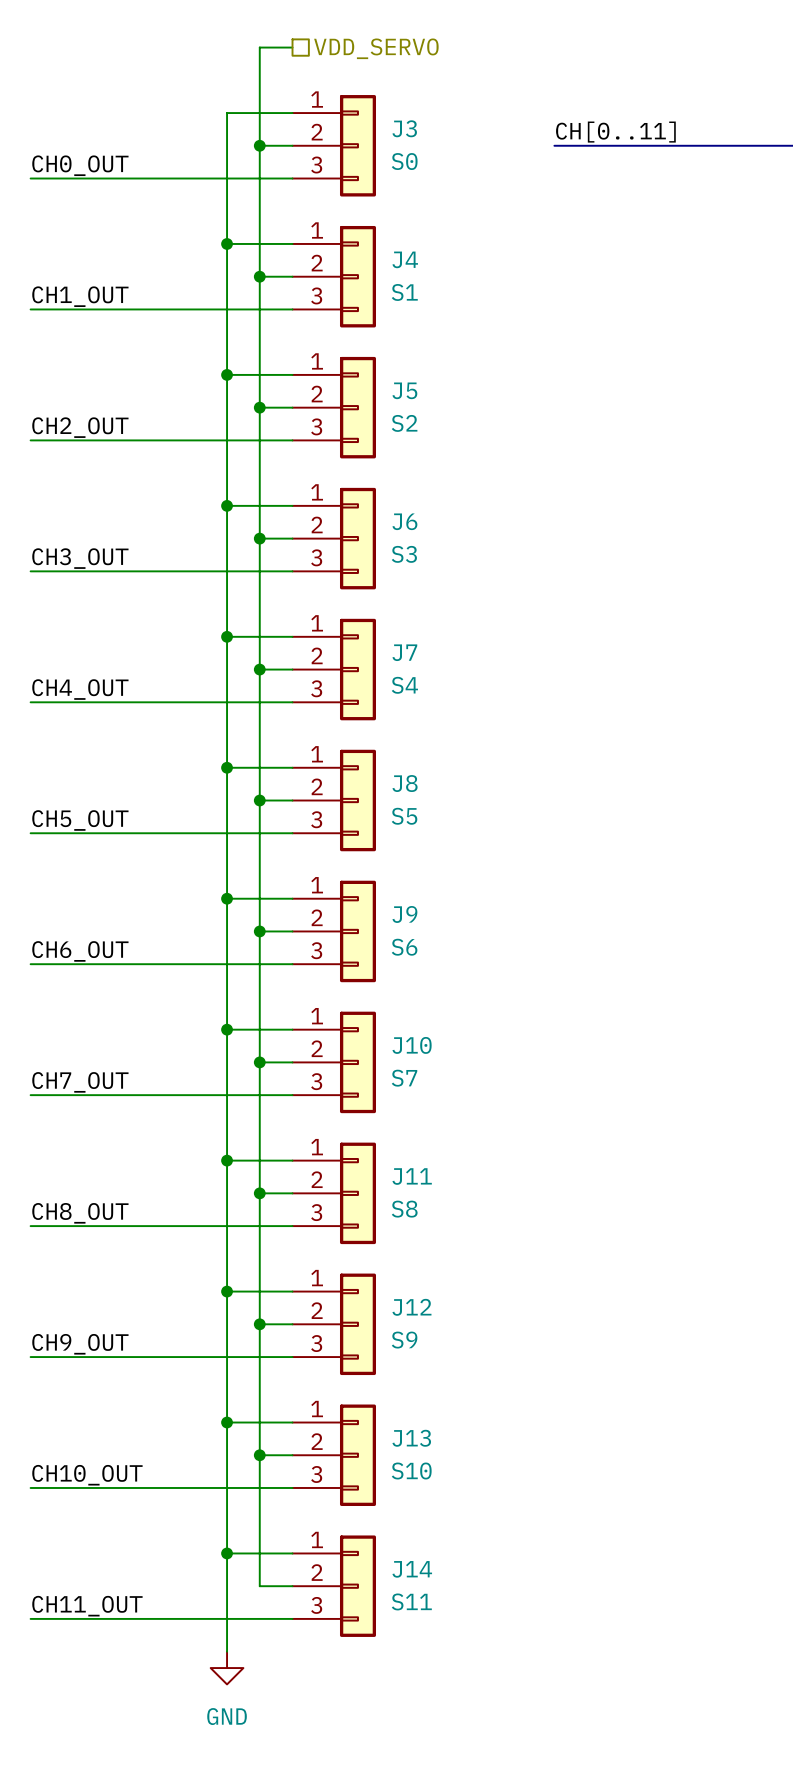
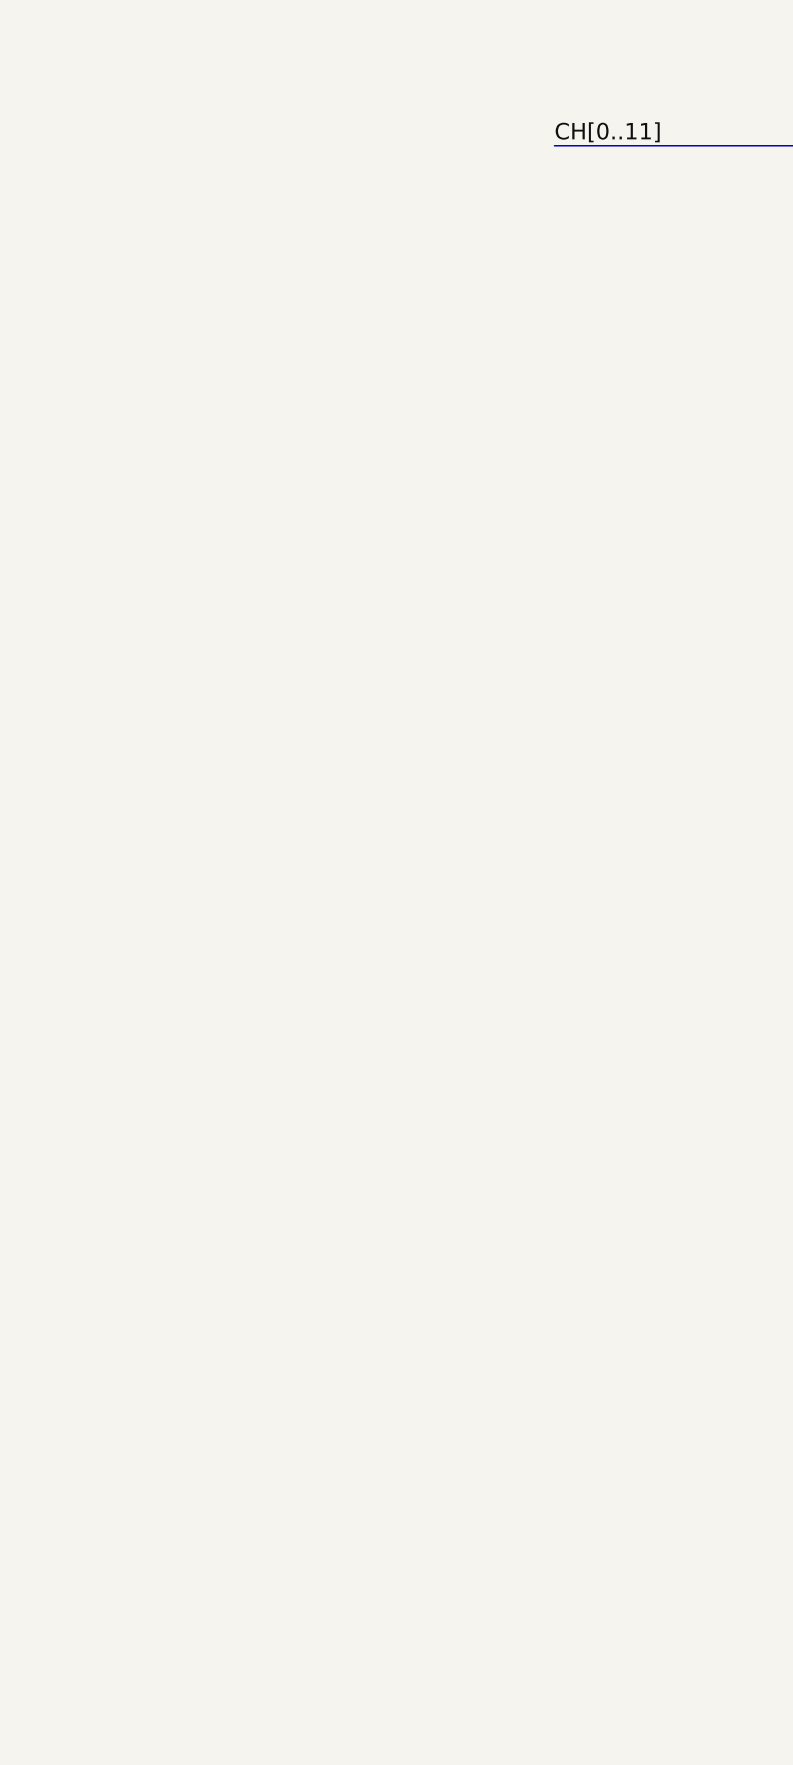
wire: (292, 47) (259, 47) (259, 1586) (292, 1586) -> none
hierarchical label: VDD_SERVO (376, 48) -> none
wire: (292, 113) (227, 113) (227, 1651) -> none
wire: (259, 145) (292, 145) -> none
junction: (259, 145) -> none
J3: S0 (334, 145) -> none
label: CH0_OUT (80, 165) -> none
wire: (30, 178) (292, 178) -> none
wire: (227, 243) (292, 243) -> none
junction: (227, 243) -> none
wire: (259, 276) (292, 276) -> none
junction: (259, 276) -> none
J4: S1 (334, 276) -> none
label: CH1_OUT (80, 296) -> none
wire: (30, 309) (292, 309) -> none
wire: (227, 374) (292, 374) -> none
junction: (227, 374) -> none
wire: (259, 407) (292, 407) -> none
junction: (259, 407) -> none
J5: S2 (334, 407) -> none
label: CH2_OUT (80, 427) -> none
wire: (30, 440) (292, 440) -> none
wire: (227, 505) (292, 505) -> none
junction: (227, 505) -> none
wire: (259, 538) (292, 538) -> none
junction: (259, 538) -> none
J6: S3 (334, 538) -> none
label: CH3_OUT (80, 558) -> none
wire: (30, 571) (292, 571) -> none
wire: (227, 636) (292, 636) -> none
junction: (227, 636) -> none
wire: (259, 669) (292, 669) -> none
junction: (259, 669) -> none
J7: S4 (334, 669) -> none
label: CH4_OUT (80, 689) -> none
wire: (30, 702) (292, 702) -> none
wire: (227, 767) (292, 767) -> none
junction: (227, 767) -> none
wire: (259, 800) (292, 800) -> none
junction: (259, 800) -> none
J8: S5 (334, 800) -> none
label: CH5_OUT (80, 820) -> none
wire: (30, 833) (292, 833) -> none
wire: (227, 898) (292, 898) -> none
junction: (227, 898) -> none
wire: (259, 931) (292, 931) -> none
junction: (259, 931) -> none
J9: S6 (334, 931) -> none
label: CH6_OUT (80, 951) -> none
wire: (30, 964) (292, 964) -> none
wire: (227, 1029) (292, 1029) -> none
junction: (227, 1029) -> none
wire: (259, 1062) (292, 1062) -> none
junction: (259, 1062) -> none
J10: S7 (334, 1062) -> none
label: CH7_OUT (80, 1082) -> none
wire: (30, 1095) (292, 1095) -> none
wire: (227, 1160) (292, 1160) -> none
junction: (227, 1160) -> none
wire: (259, 1193) (292, 1193) -> none
junction: (259, 1193) -> none
J11: S8 (334, 1193) -> none
label: CH8_OUT (80, 1213) -> none
wire: (30, 1226) (292, 1226) -> none
wire: (227, 1291) (292, 1291) -> none
junction: (227, 1291) -> none
wire: (259, 1324) (292, 1324) -> none
junction: (259, 1324) -> none
J12: S9 (334, 1324) -> none
label: CH9_OUT (80, 1344) -> none
wire: (30, 1357) (292, 1357) -> none
wire: (227, 1422) (292, 1422) -> none
junction: (227, 1422) -> none
wire: (259, 1455) (292, 1455) -> none
junction: (259, 1455) -> none
J13: S10 (334, 1455) -> none
label: CH10_OUT (87, 1475) -> none
wire: (30, 1487) (292, 1487) -> none
wire: (227, 1553) (292, 1553) -> none
junction: (227, 1553) -> none
J14: S11 (334, 1586) -> none
label: CH11_OUT (87, 1606) -> none
wire: (30, 1618) (292, 1618) -> none
power symbol: GND (227, 1668) -> none

